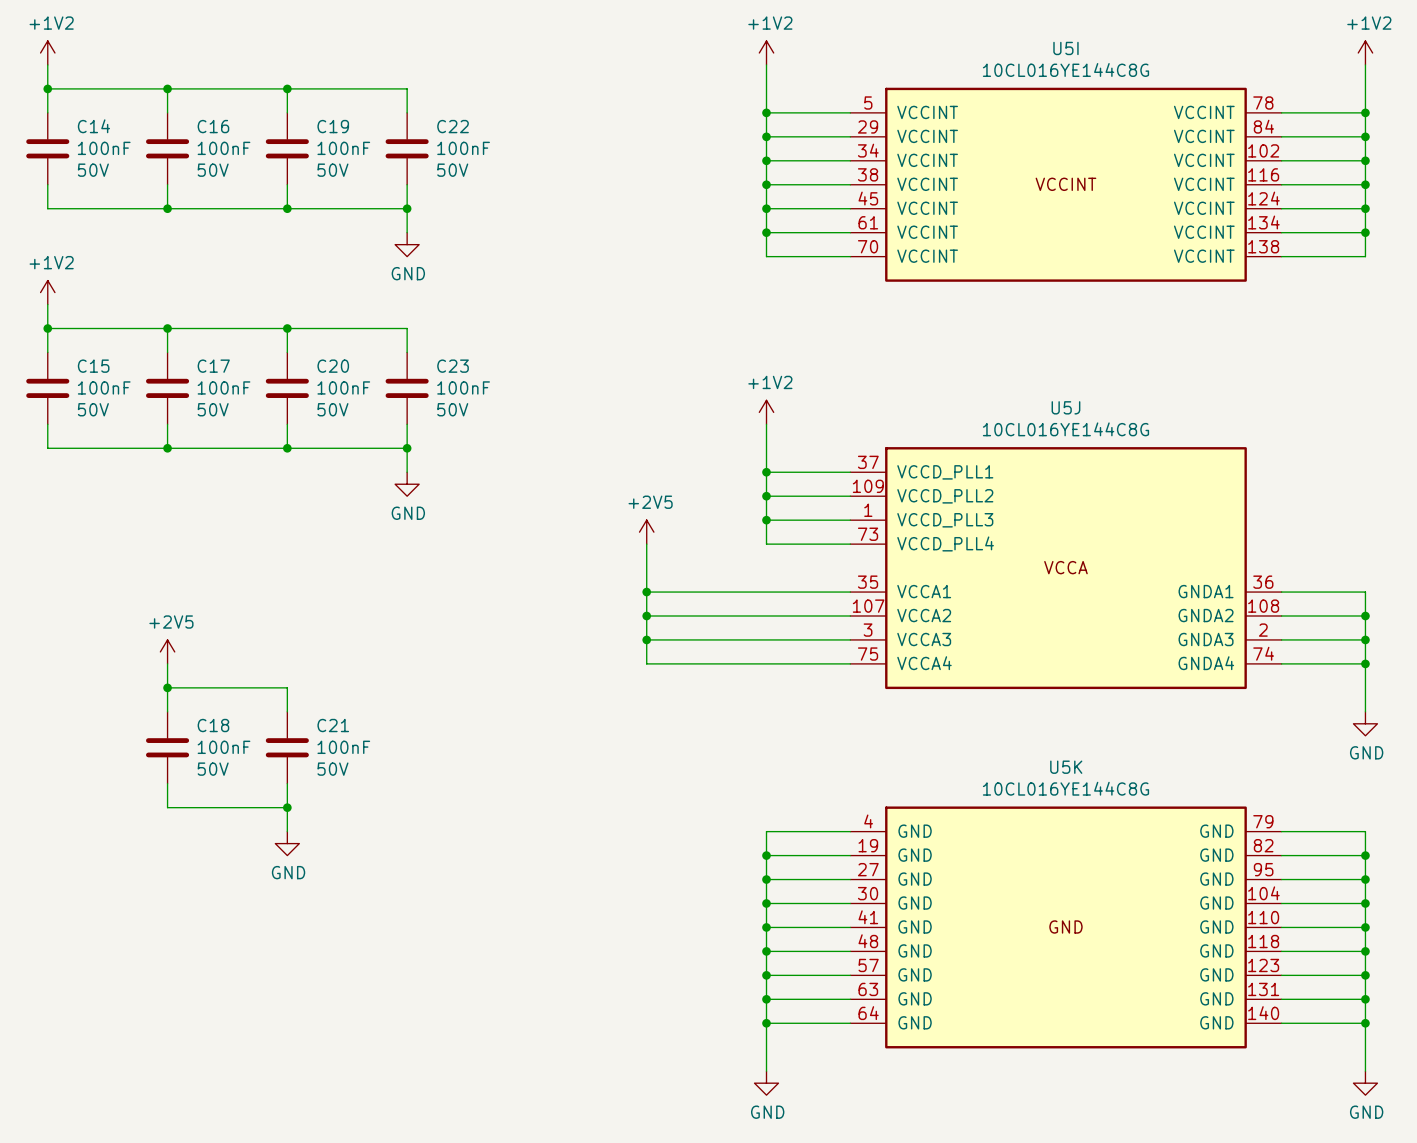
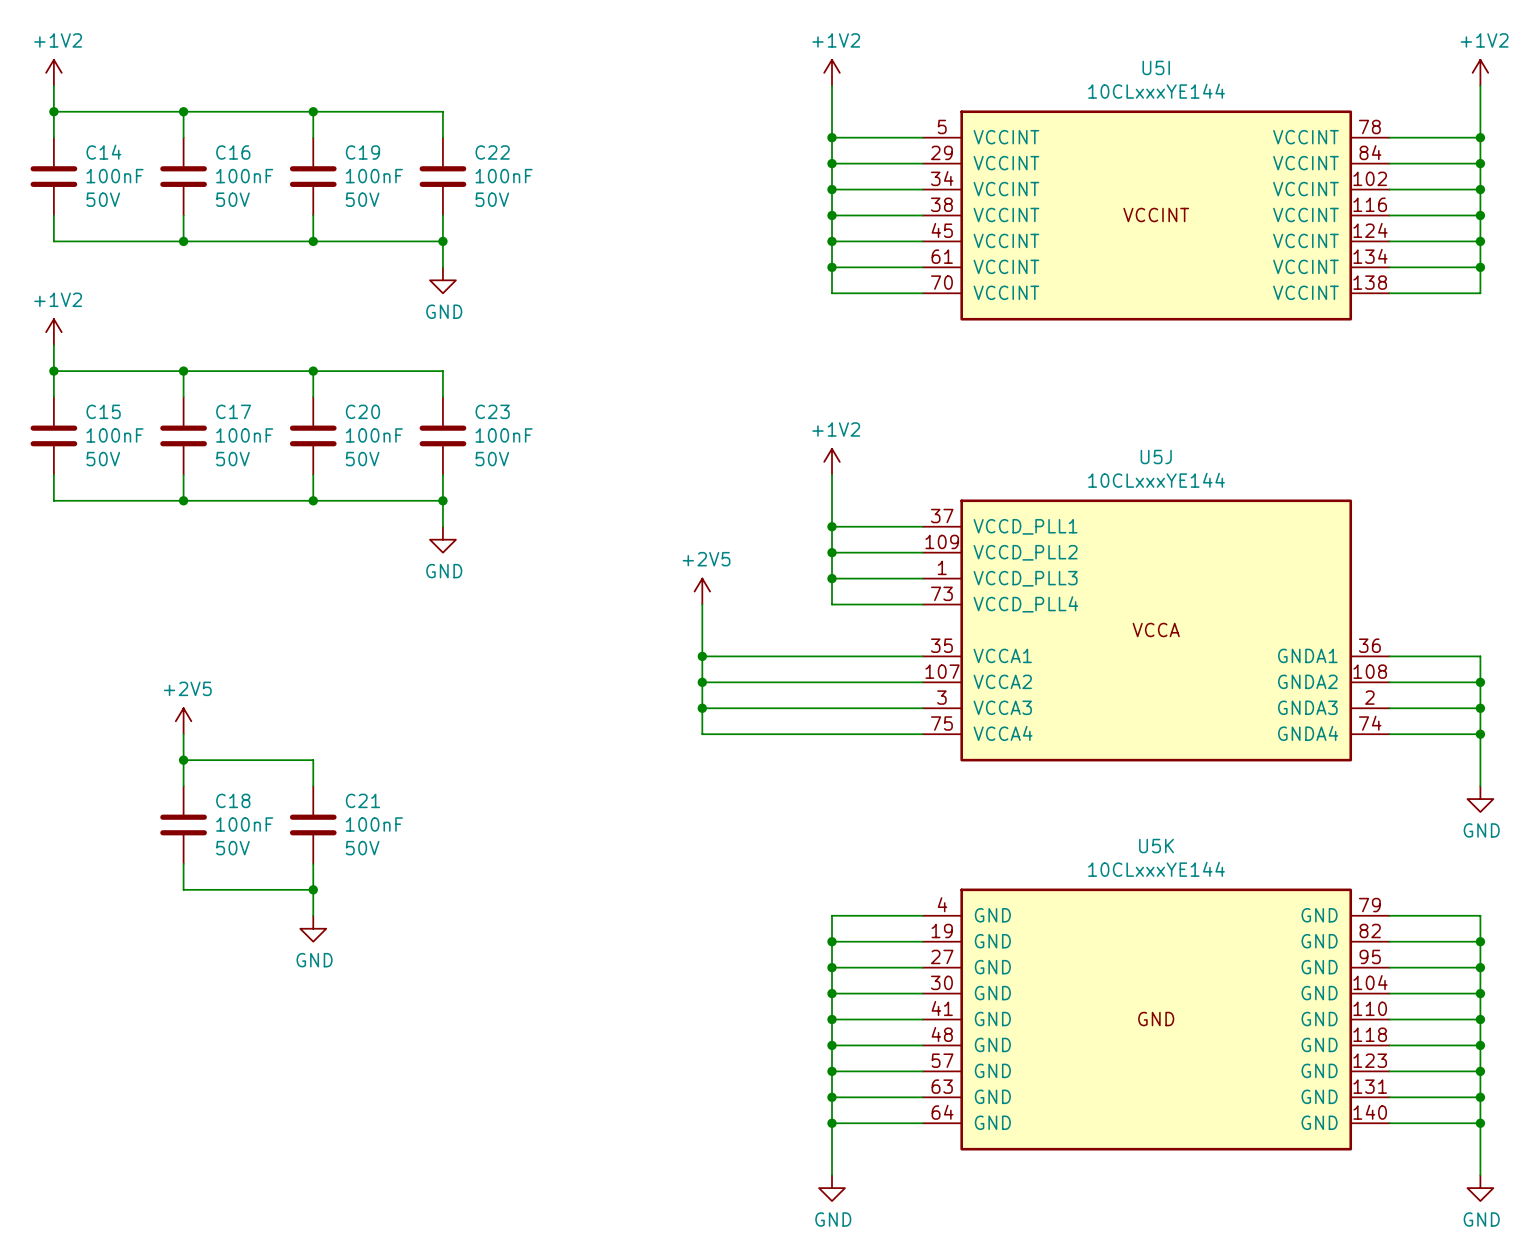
U5I value: 10CL016YE144C8G (1065, 69) -> 10CLxxxYE144 (1156, 91)
U5J value: 10CL016YE144C8G (1065, 429) -> 10CLxxxYE144 (1156, 480)
U5K value: 10CL016YE144C8G (1065, 788) -> 10CLxxxYE144 (1156, 869)

